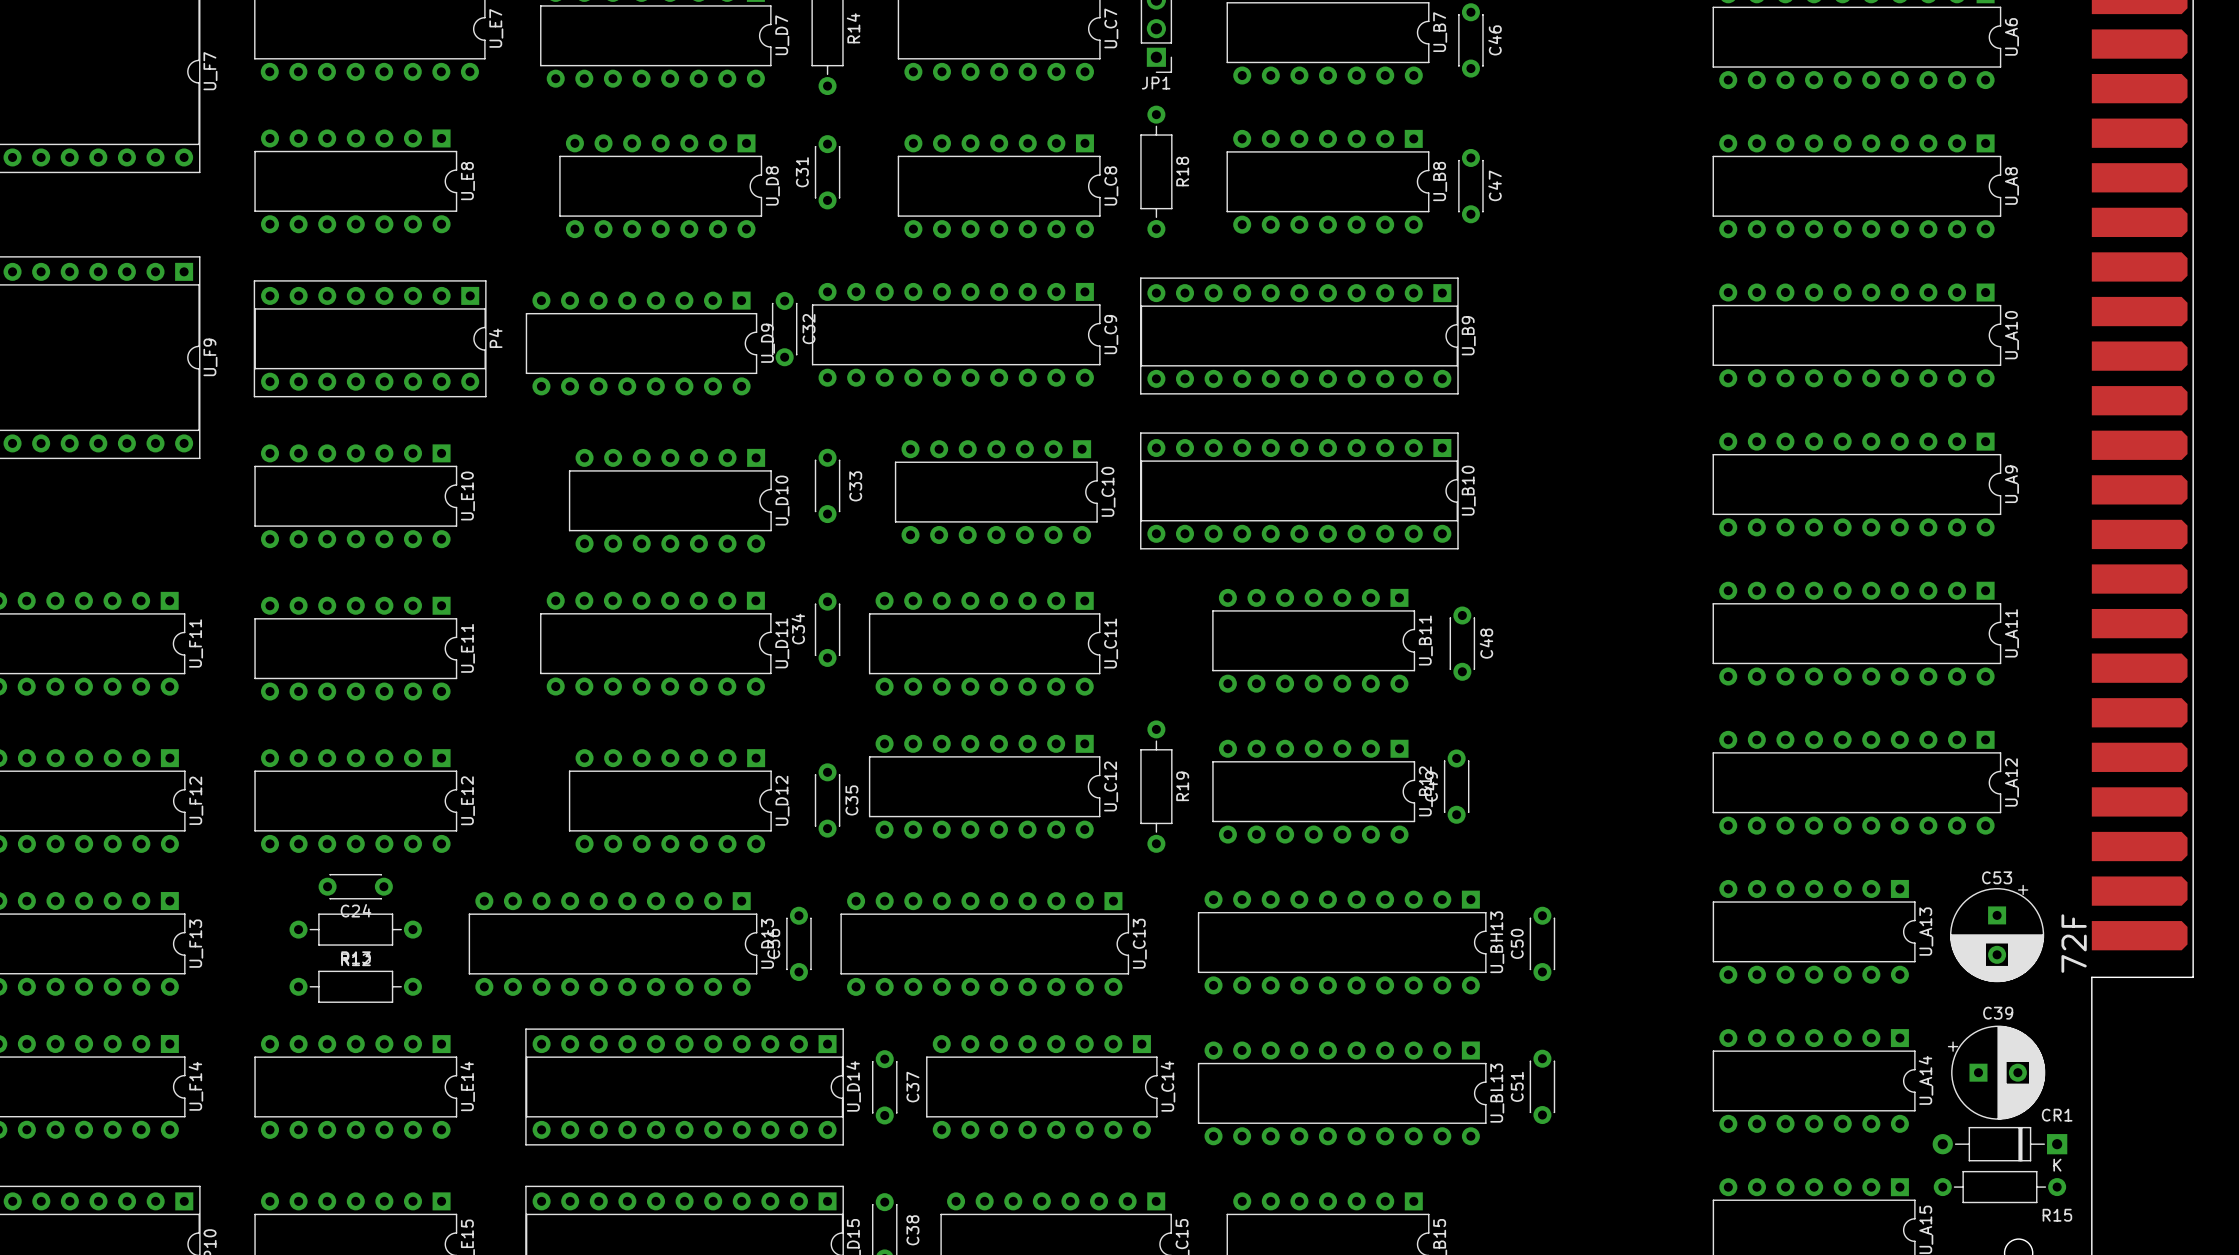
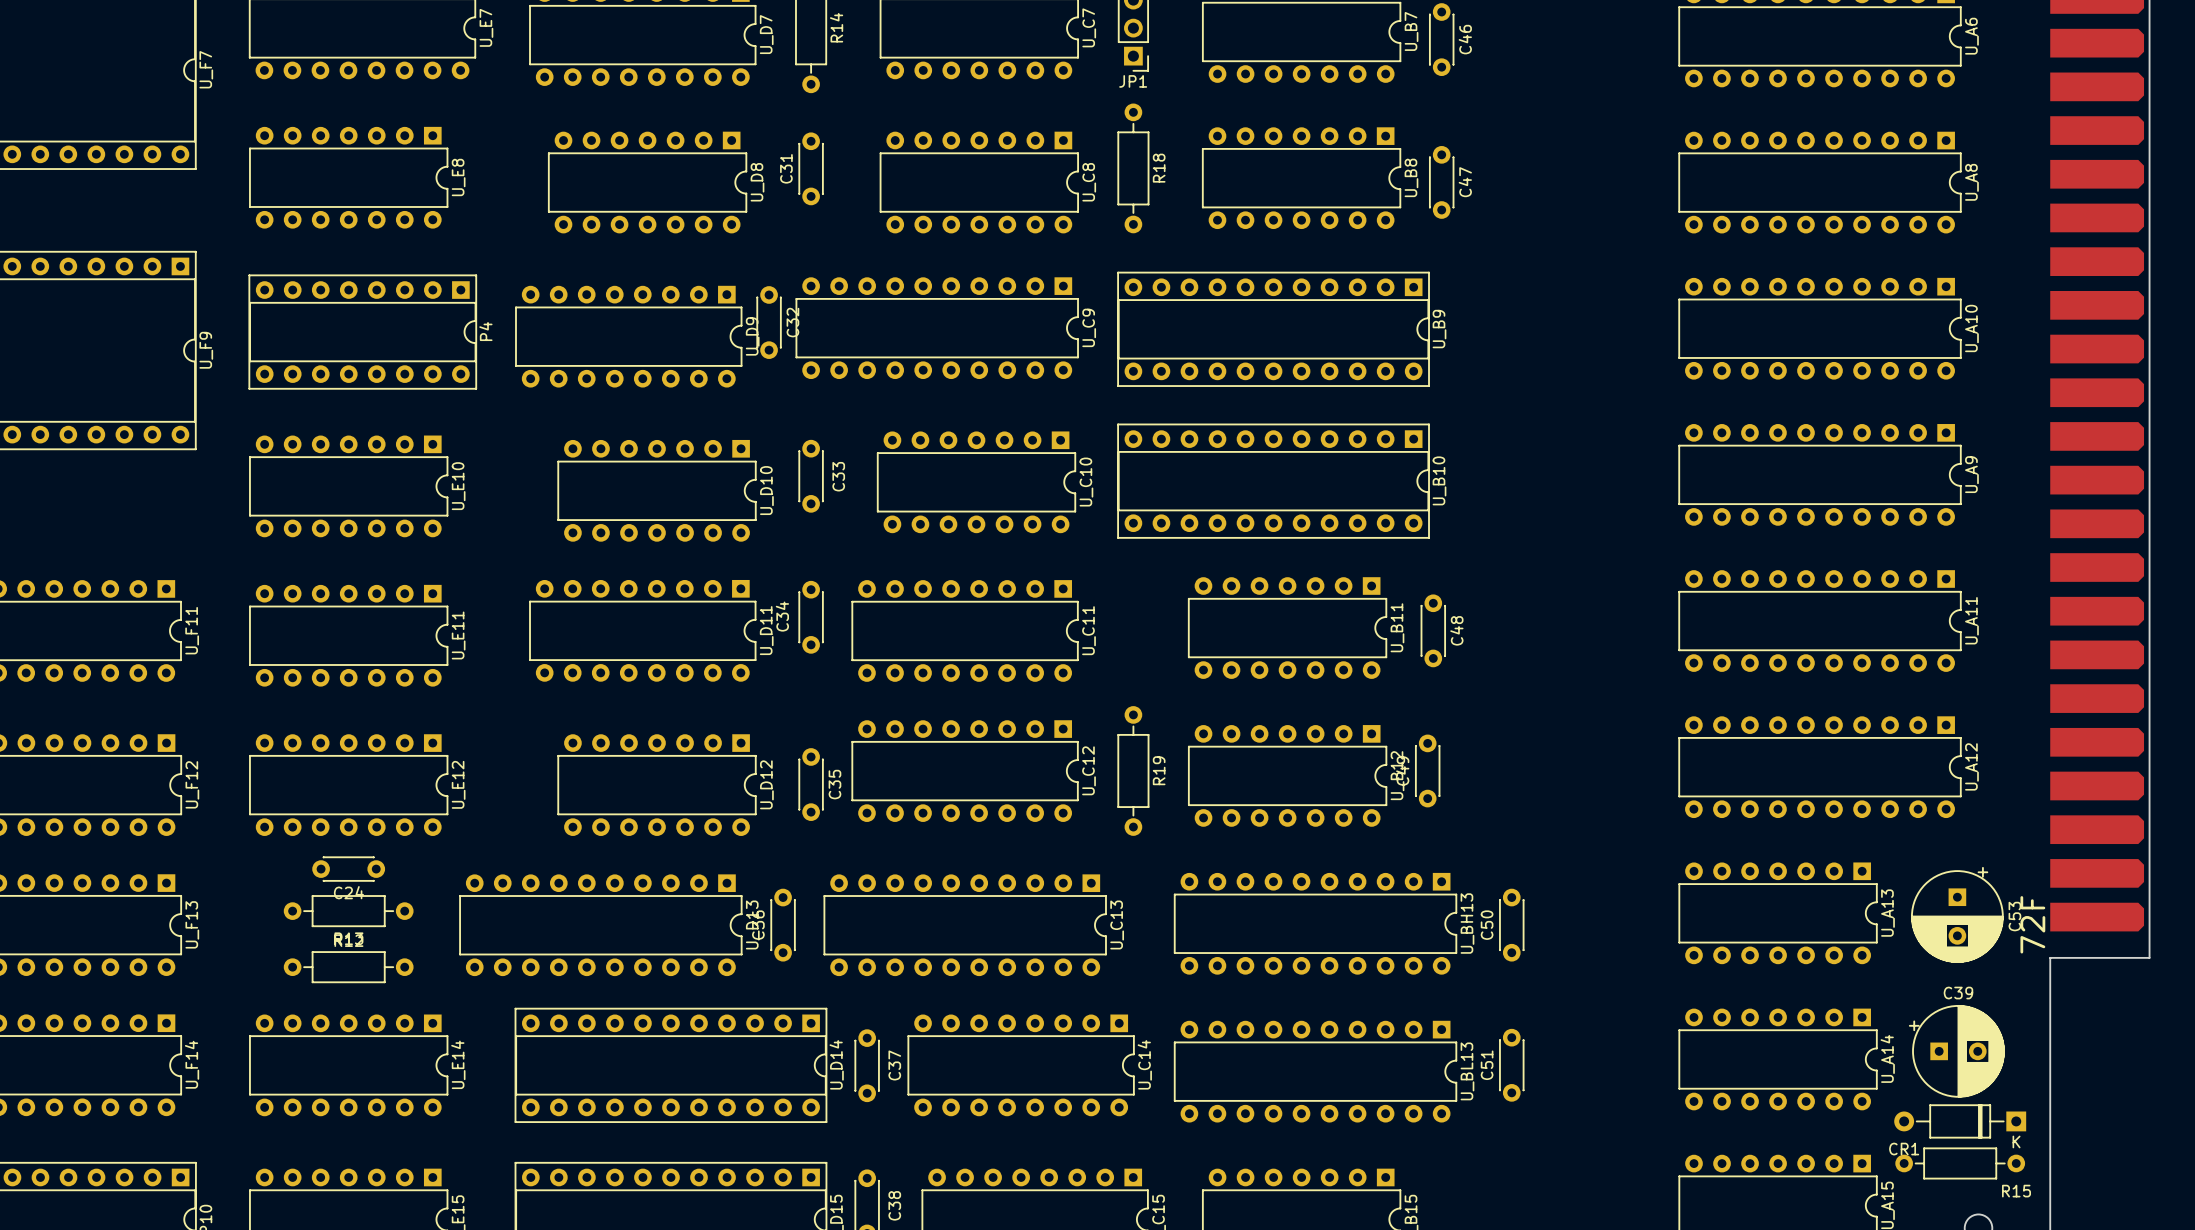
C53 name rotation: 0° (1997, 877) -> 90° counterclockwise (2014, 916)
C53 name position: C53 (1997, 877) -> C53 (2014, 916)
CR1 name position: CR1 (2057, 1115) -> CR1 (1904, 1149)

